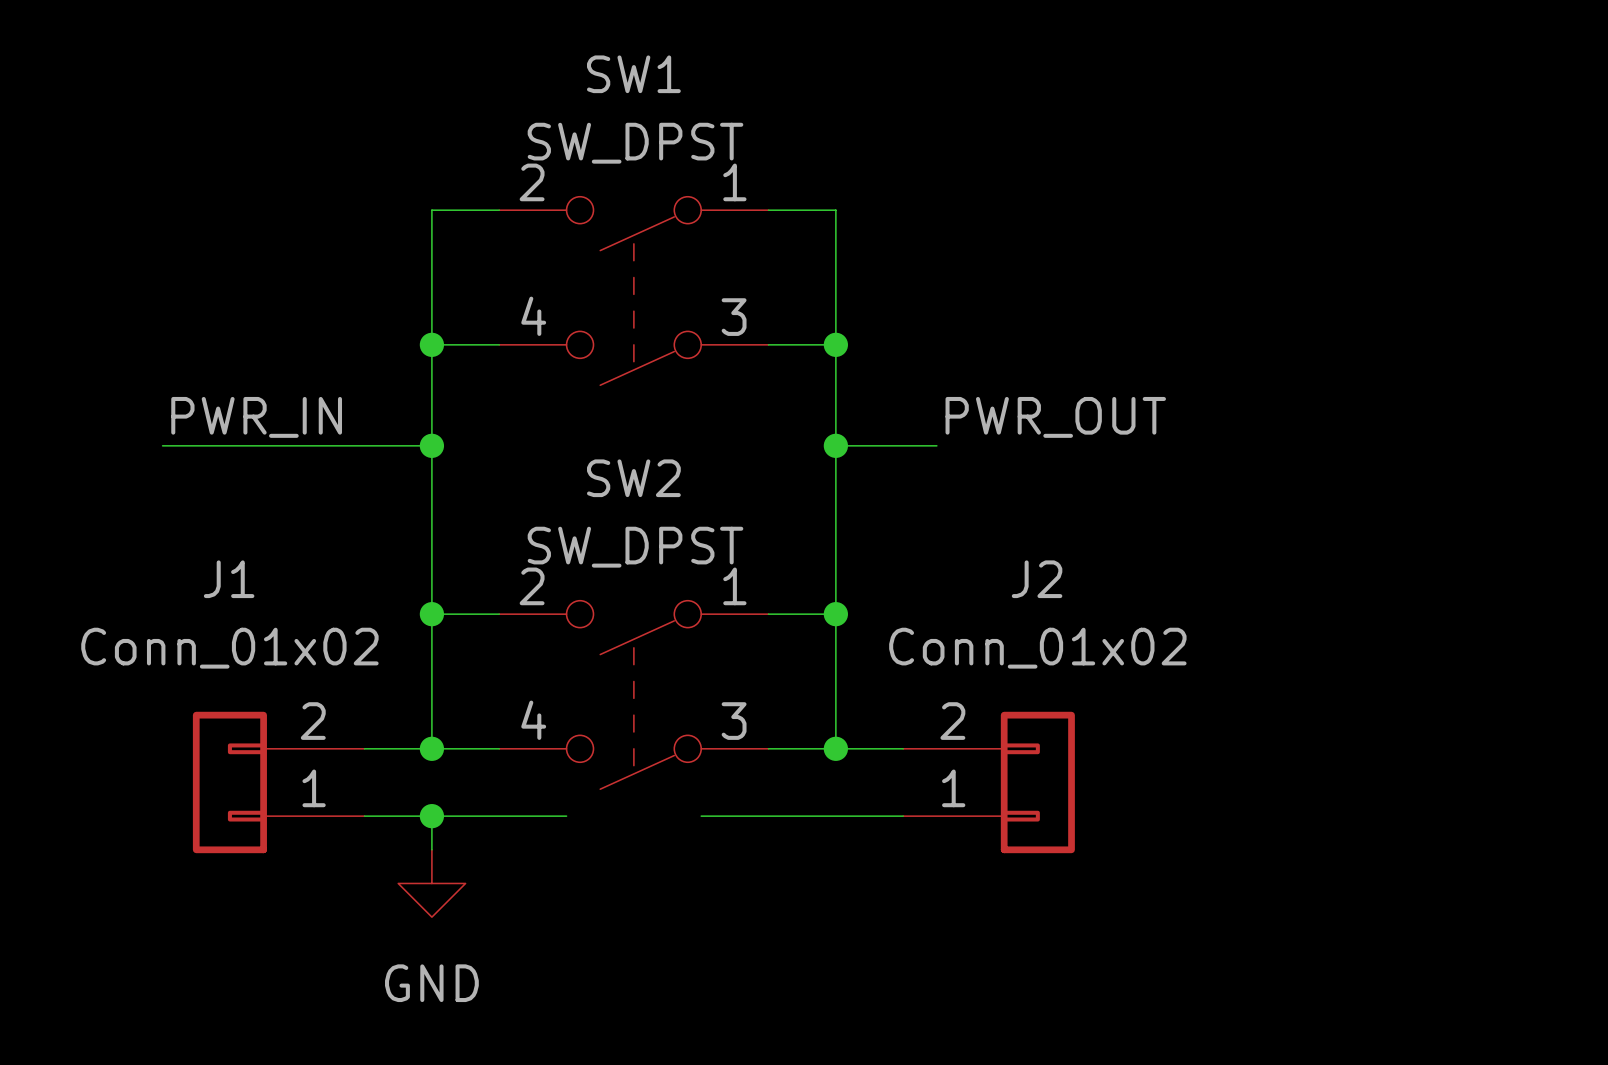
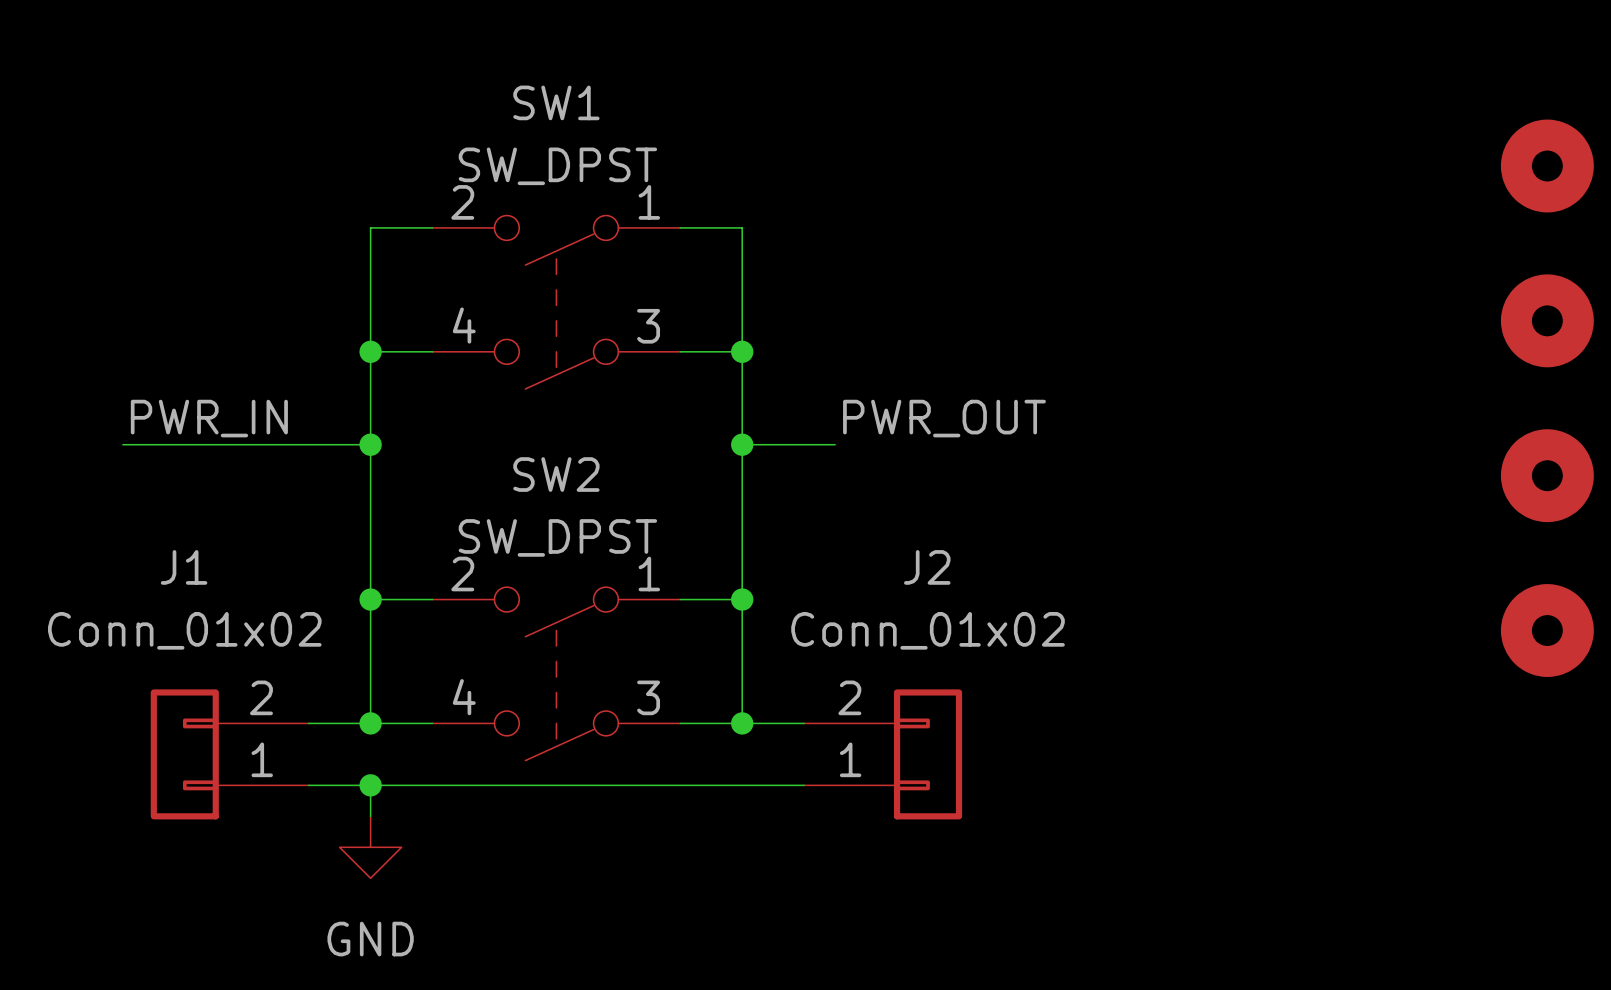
wire: none -> (494, 785) (618, 785)

